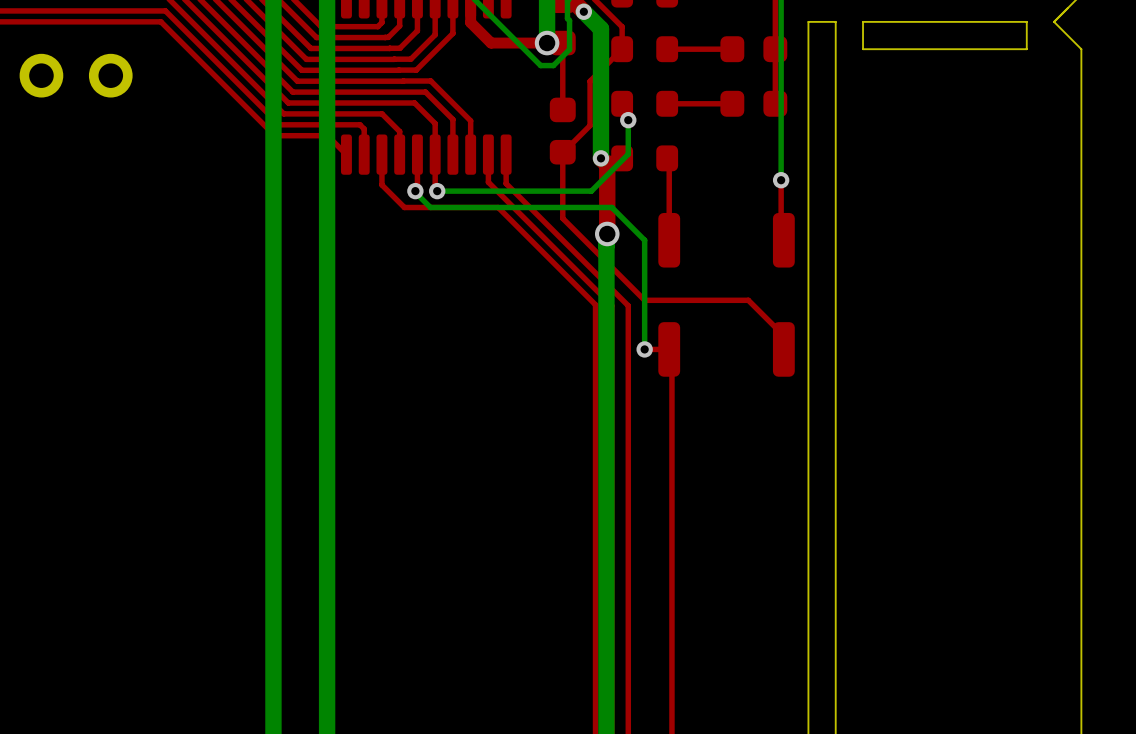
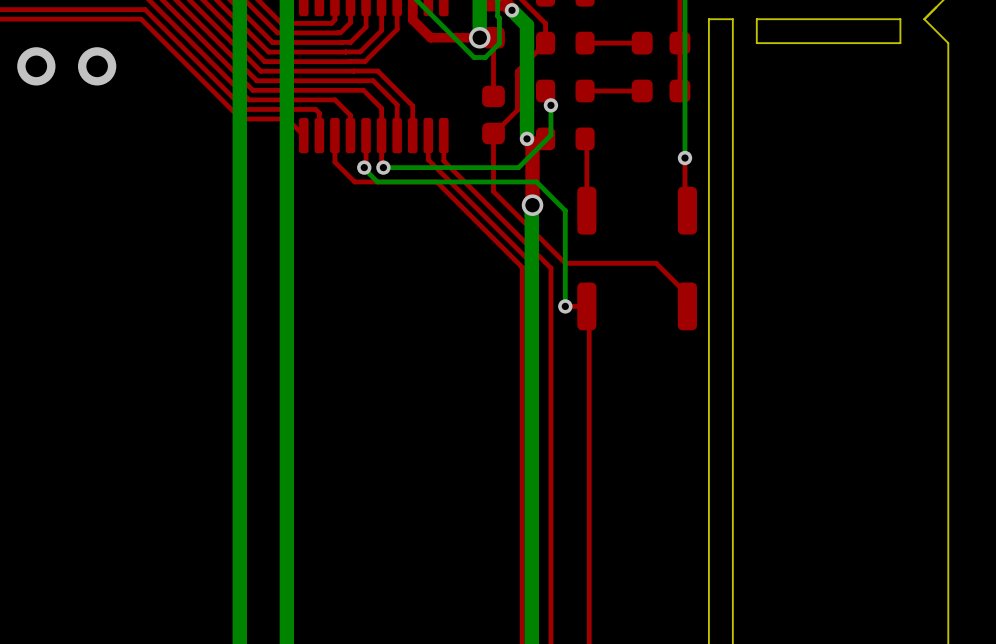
part: (41, 75) -> none
via: none -> (36, 66)
part: (110, 75) -> none
via: none -> (97, 66)

